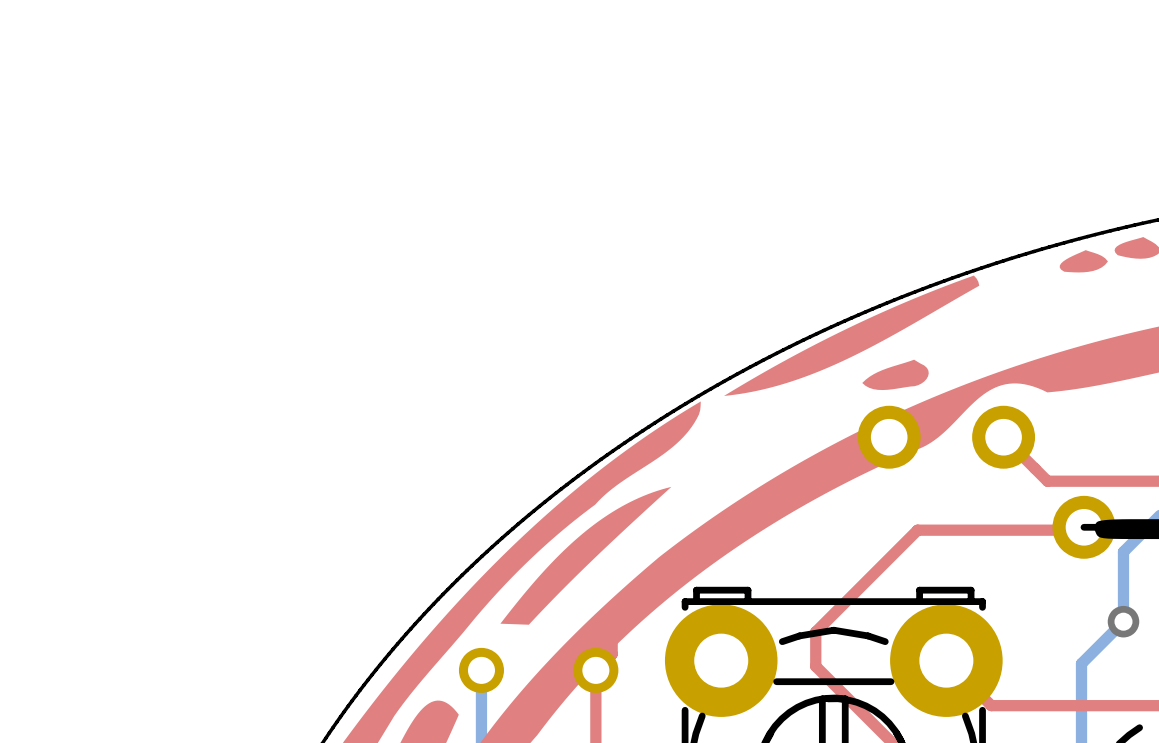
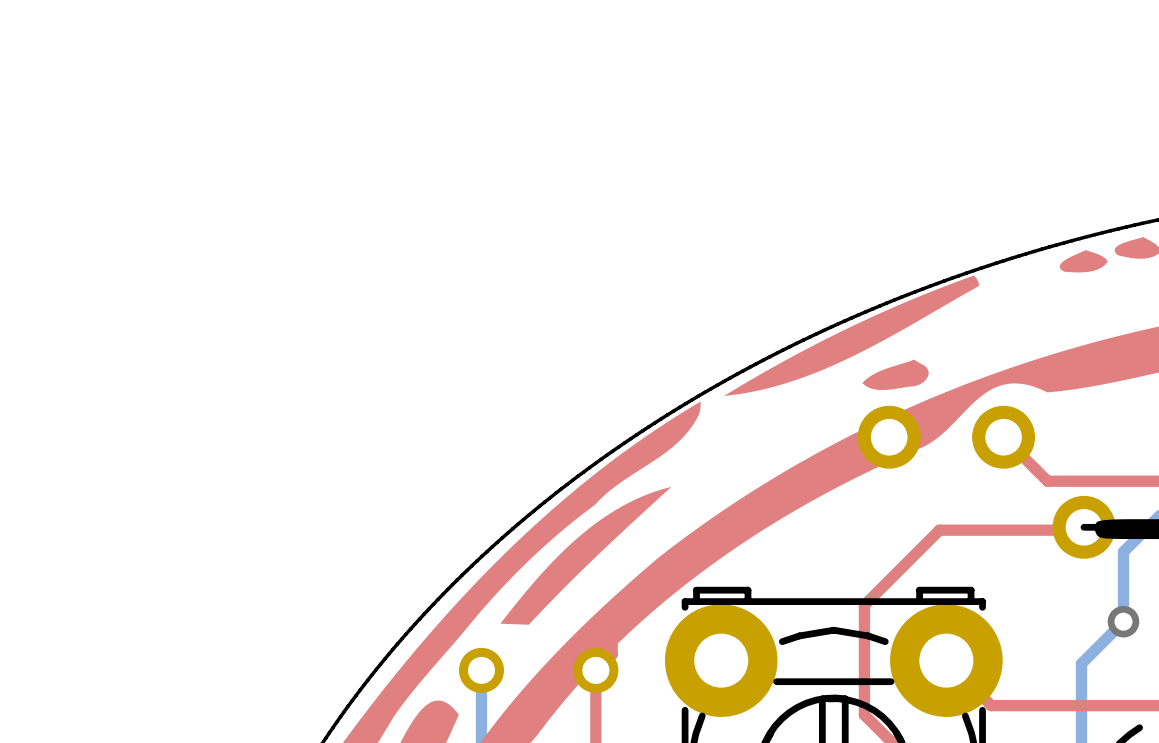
top track: (939, 530) (917, 530) (815, 631) (815, 666) (864, 714) -> (939, 530) (864, 605) (864, 714)

